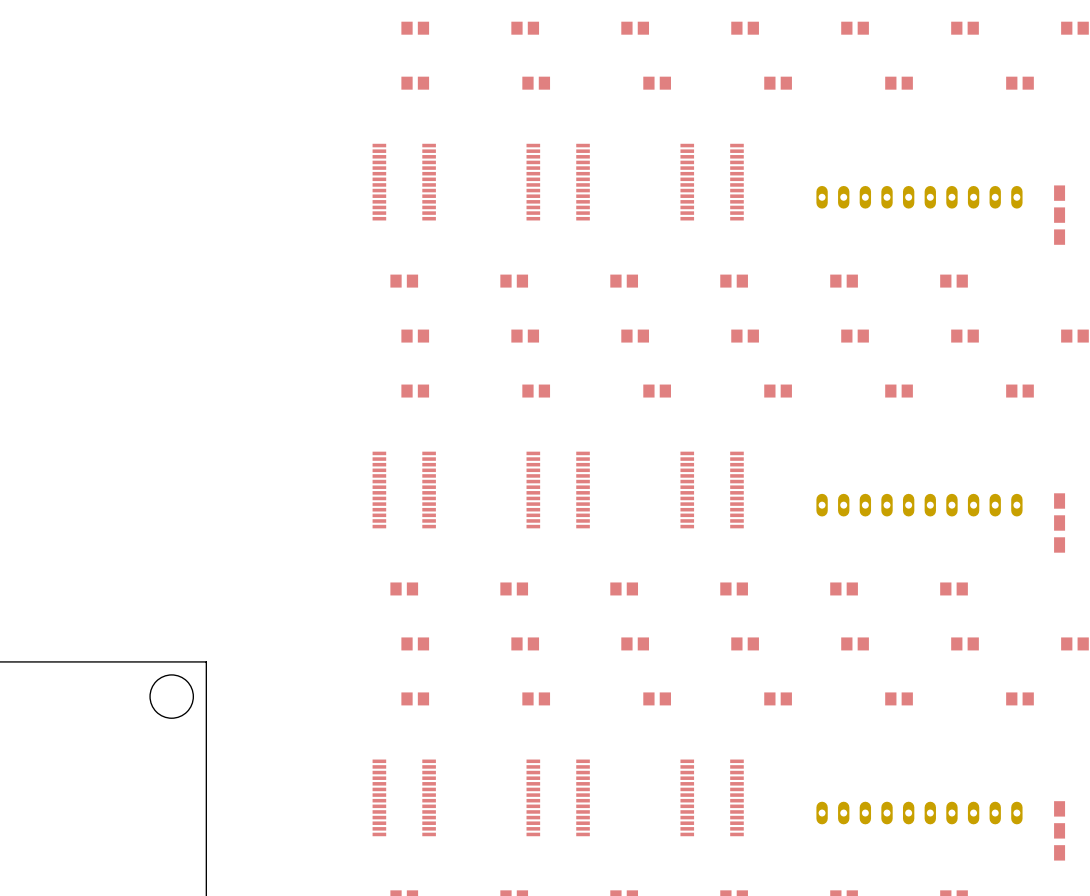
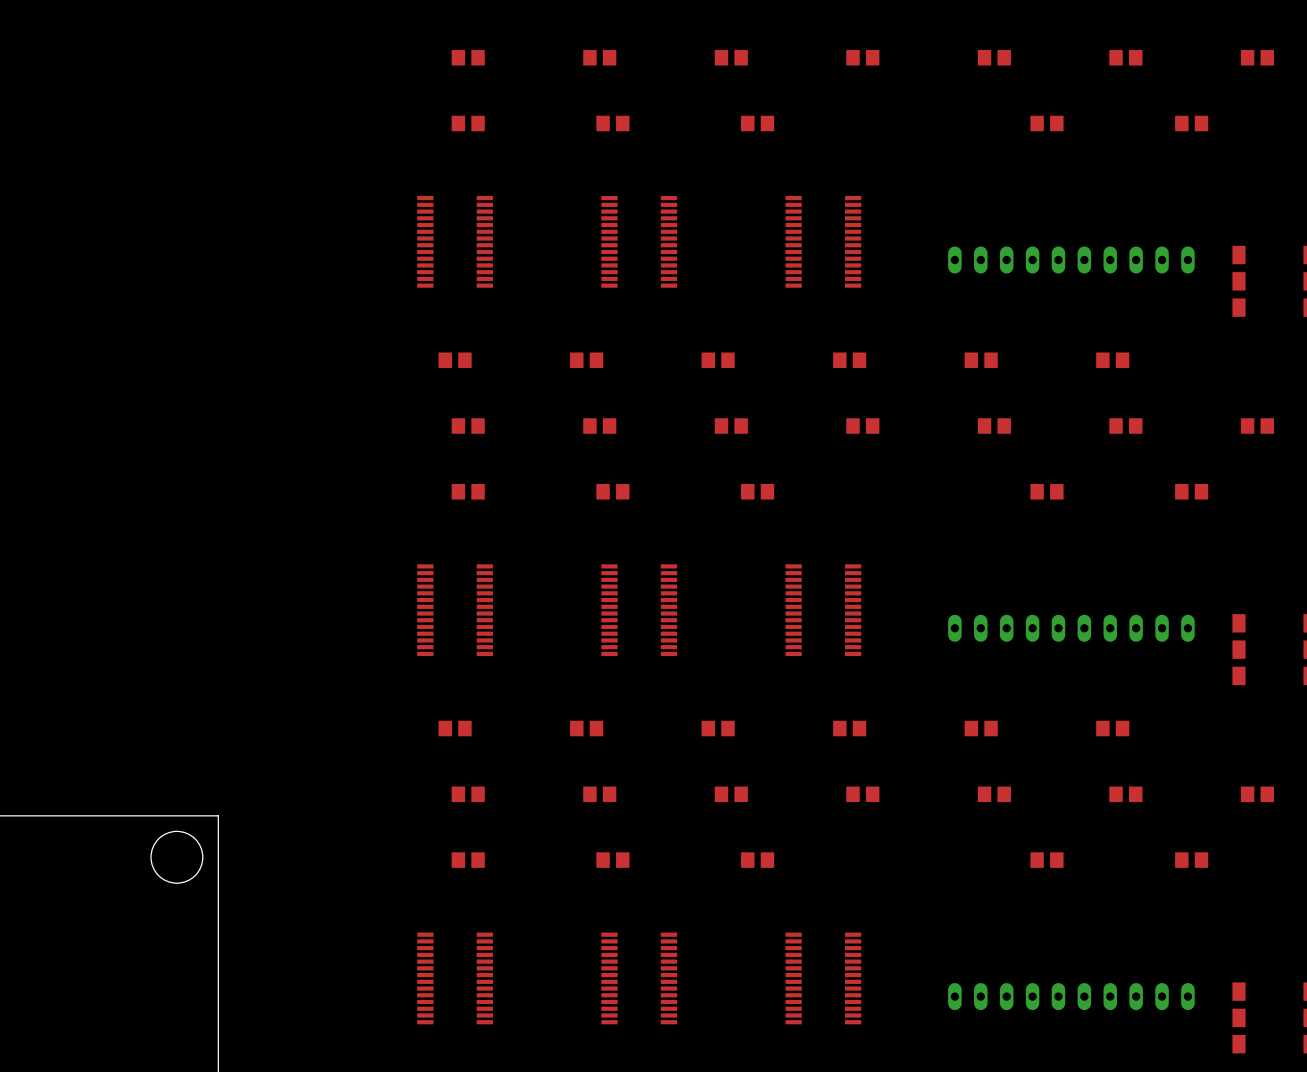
part: (778, 83) -> none
part: (778, 391) -> none
part: (778, 698) -> none

